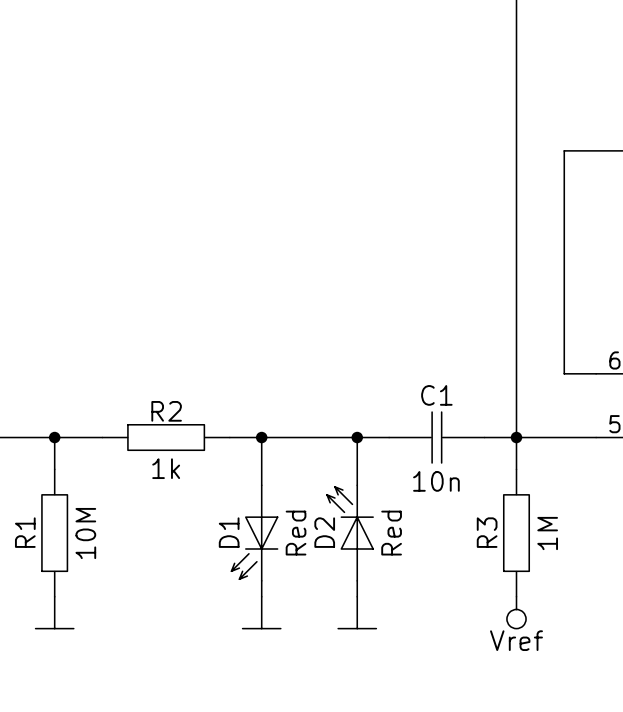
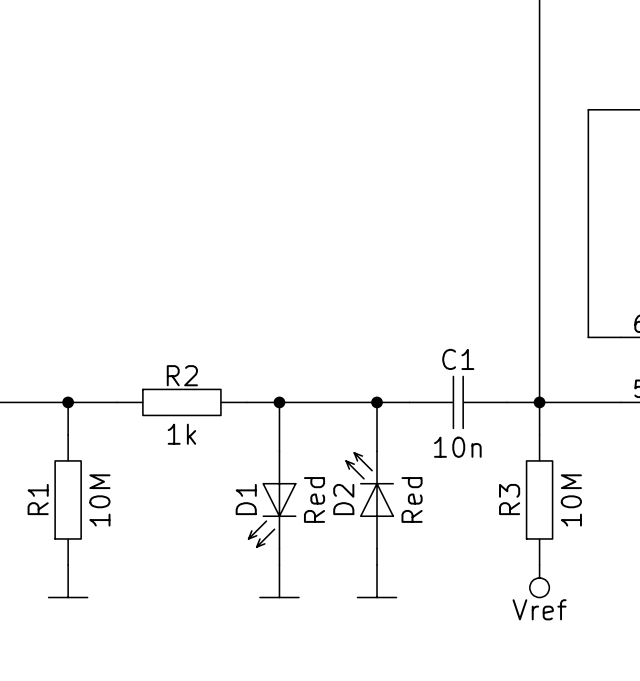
R3 value: 1M (547, 533) -> 10M (571, 500)

